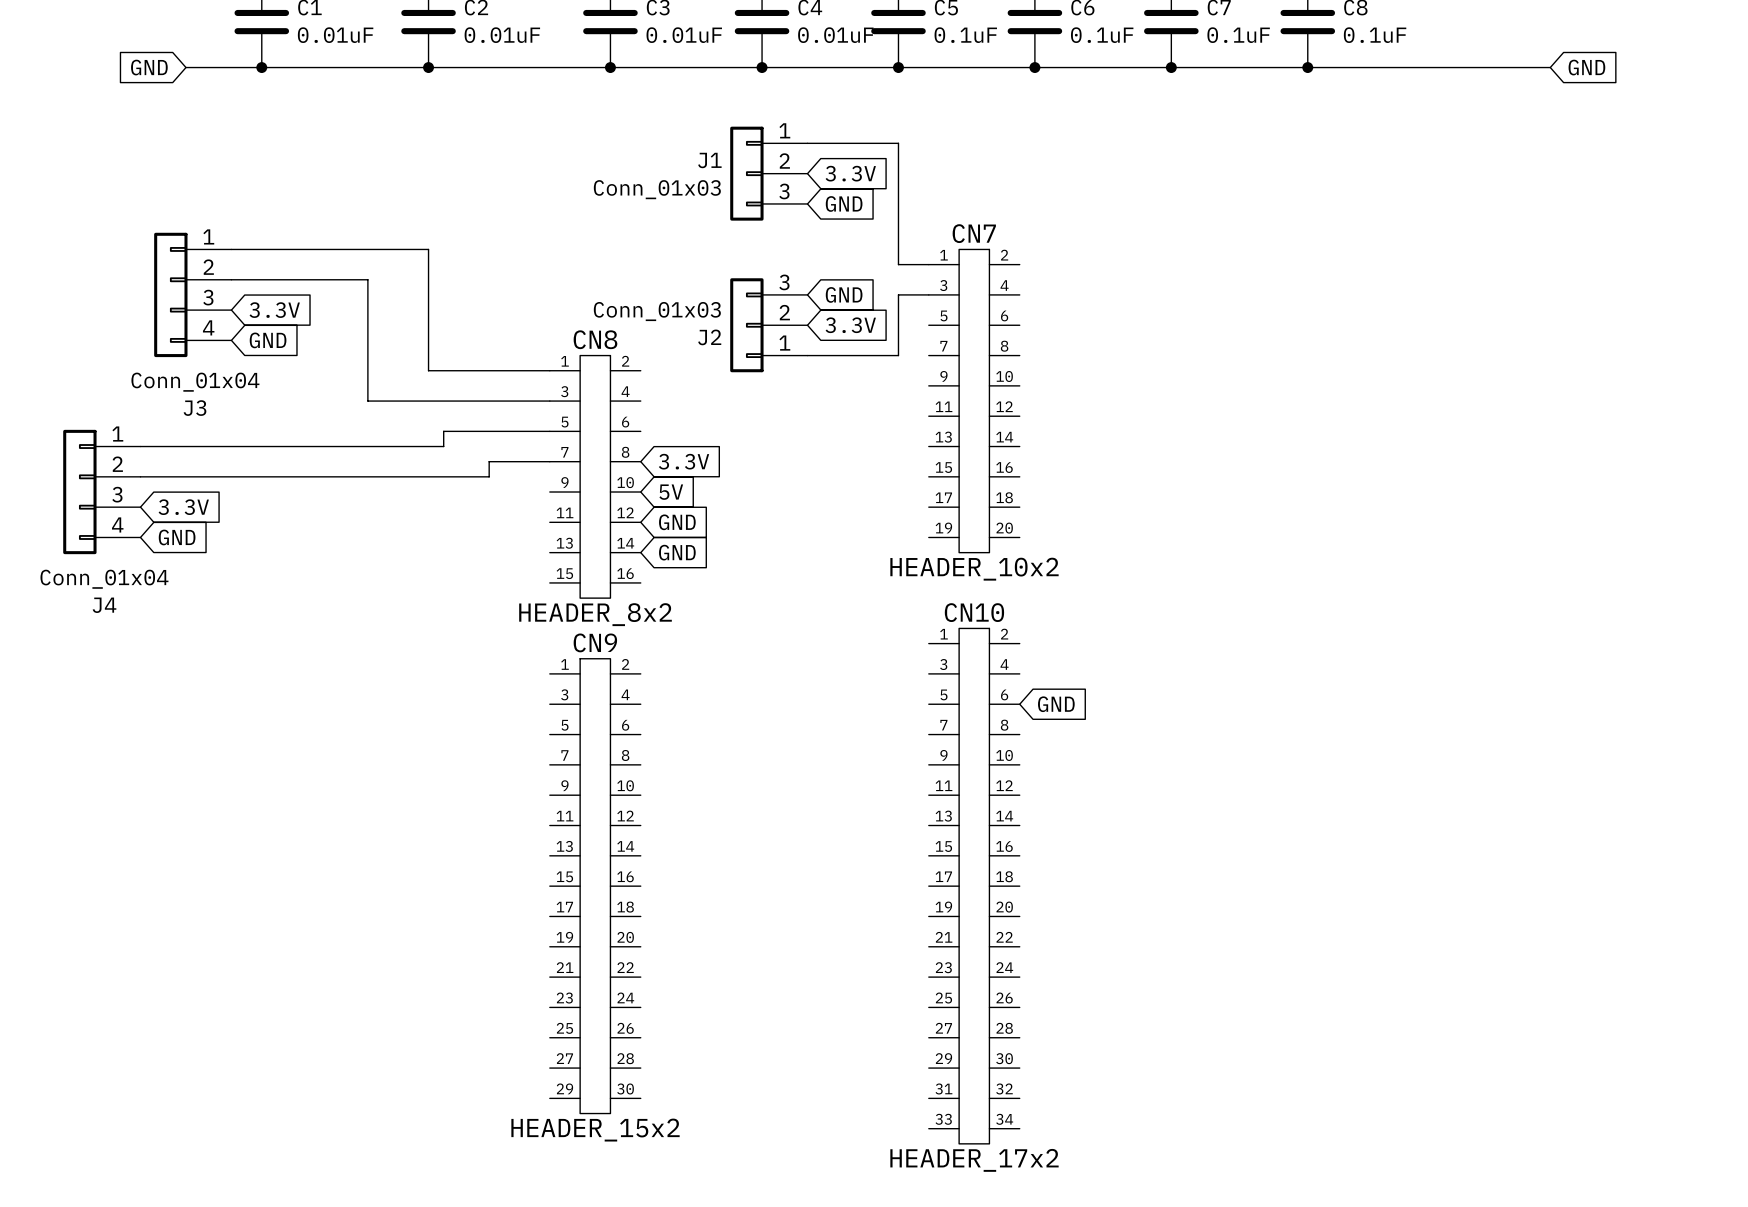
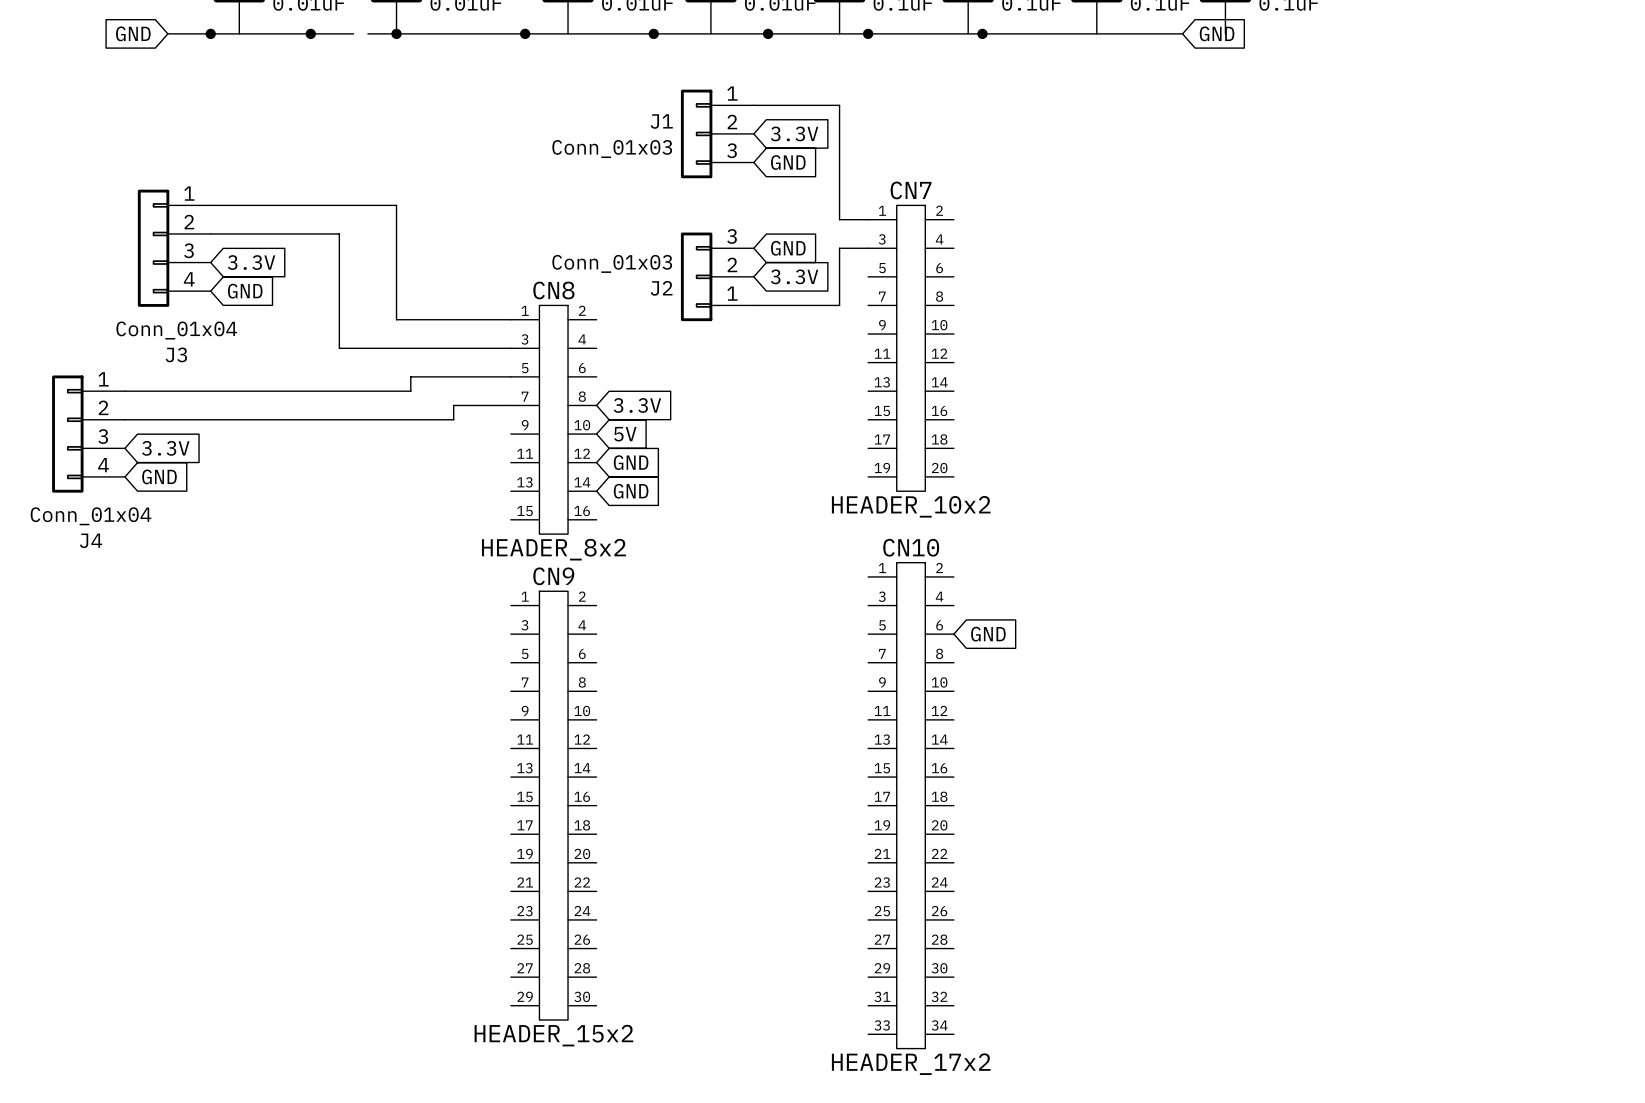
junction position: (261, 67) -> (210, 33)
junction: none -> (310, 33)
wire: (383, 67) (398, 67) -> none
junction: none -> (525, 33)
junction: (610, 67) -> none
junction: none -> (653, 33)
junction: (762, 67) -> none
junction: none -> (768, 33)
junction position: (898, 67) -> (868, 33)
junction position: (1034, 67) -> (982, 33)
junction: (1171, 67) -> none
wire: (1262, 67) (1550, 67) -> none
junction: (1307, 67) -> none
global label position: GND (1586, 67) -> GND (1217, 33)

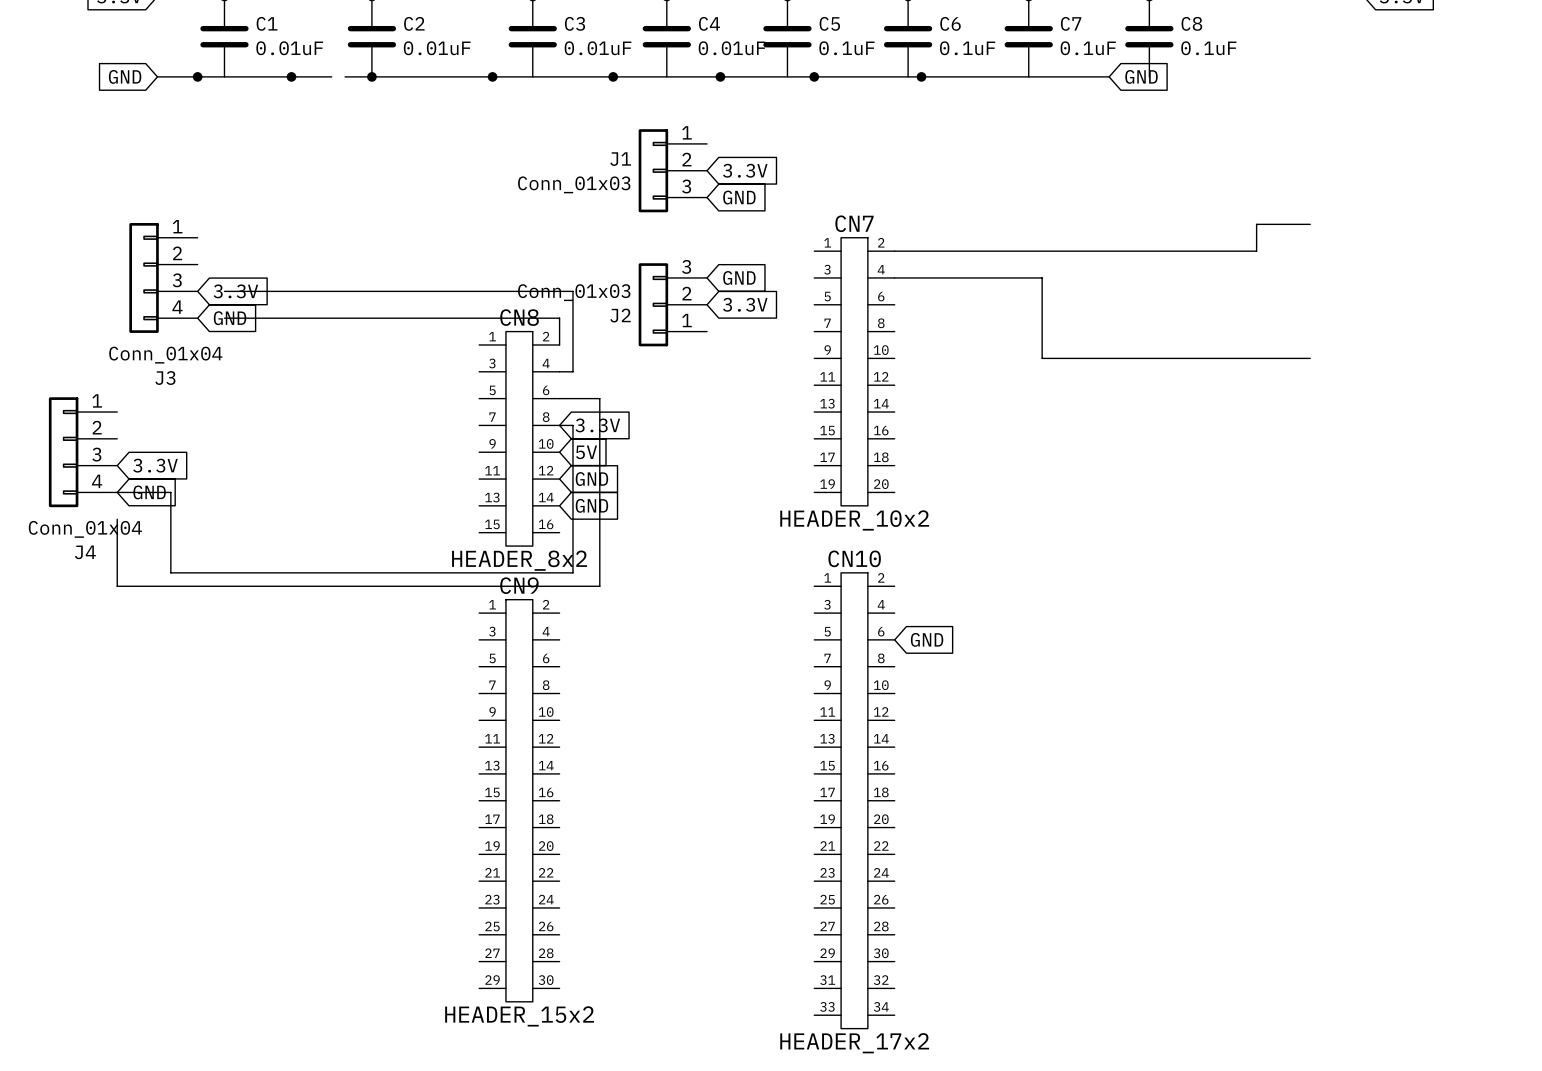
wire: (753, 105) (839, 105) (839, 219) (868, 219) -> none
wire: none -> (1310, 224) (1256, 224) (1256, 251) (894, 251)
wire: (210, 205) (396, 205) (396, 319) (510, 319) -> none
wire: (210, 233) (339, 233) (339, 348) (510, 348) -> none
wire: (868, 248) (839, 248) (839, 305) (753, 305) -> none
wire: none -> (894, 277) (1042, 277) (1042, 358) (1310, 358)
wire: none -> (224, 291) (572, 291) (572, 371) (559, 371)
wire: none -> (224, 318) (559, 318) (559, 344)
wire: (510, 376) (410, 376) (410, 391) (124, 391) -> none
wire: none -> (559, 398) (599, 398) (599, 586) (117, 586) (117, 519)
wire: (510, 405) (453, 405) (453, 419) (124, 419) -> none
wire: none -> (559, 425) (572, 425) (572, 572) (170, 572) (170, 492) (117, 492)

